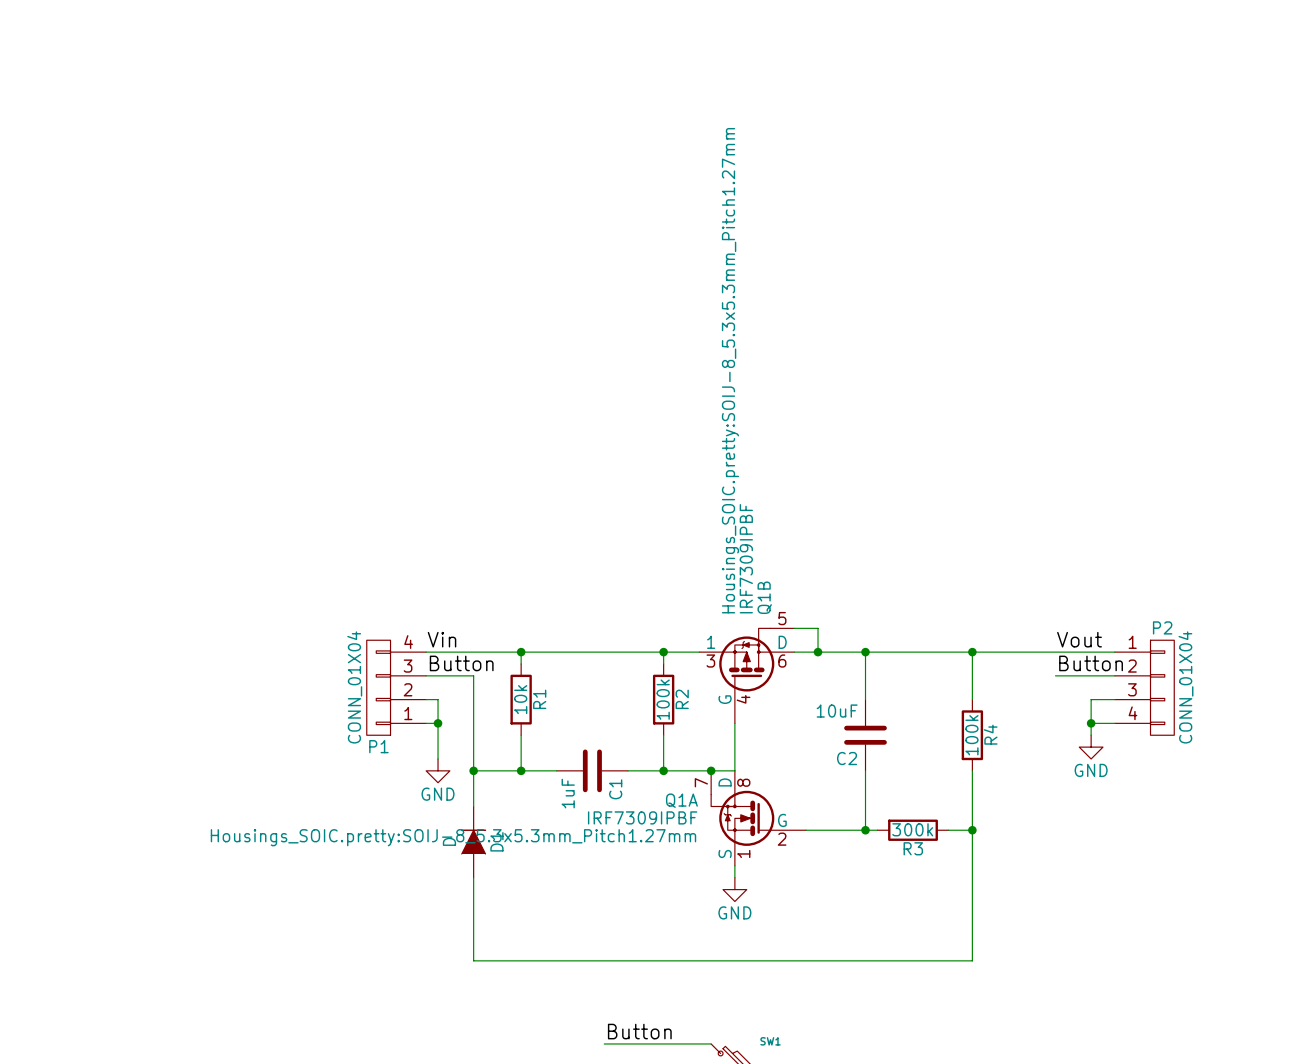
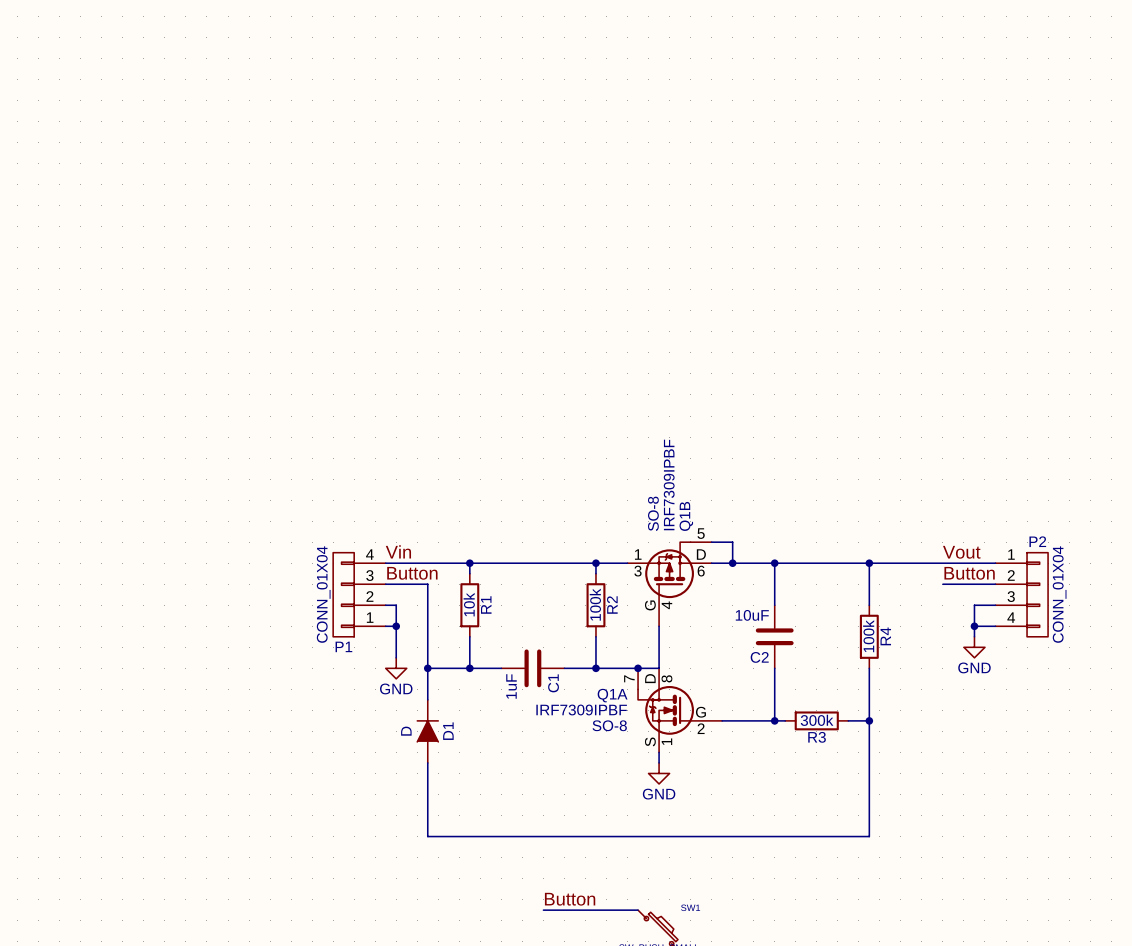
Q1B text: Housings_SOIC.pretty:SOIJ-8_5.3x5.3mm_Pitch1.27mm (730, 370) -> SO-8 (653, 513)
Q1A text: Housings_SOIC.pretty:SOIJ-8_5.3x5.3mm_Pitch1.27mm (453, 837) -> SO-8 (609, 725)

